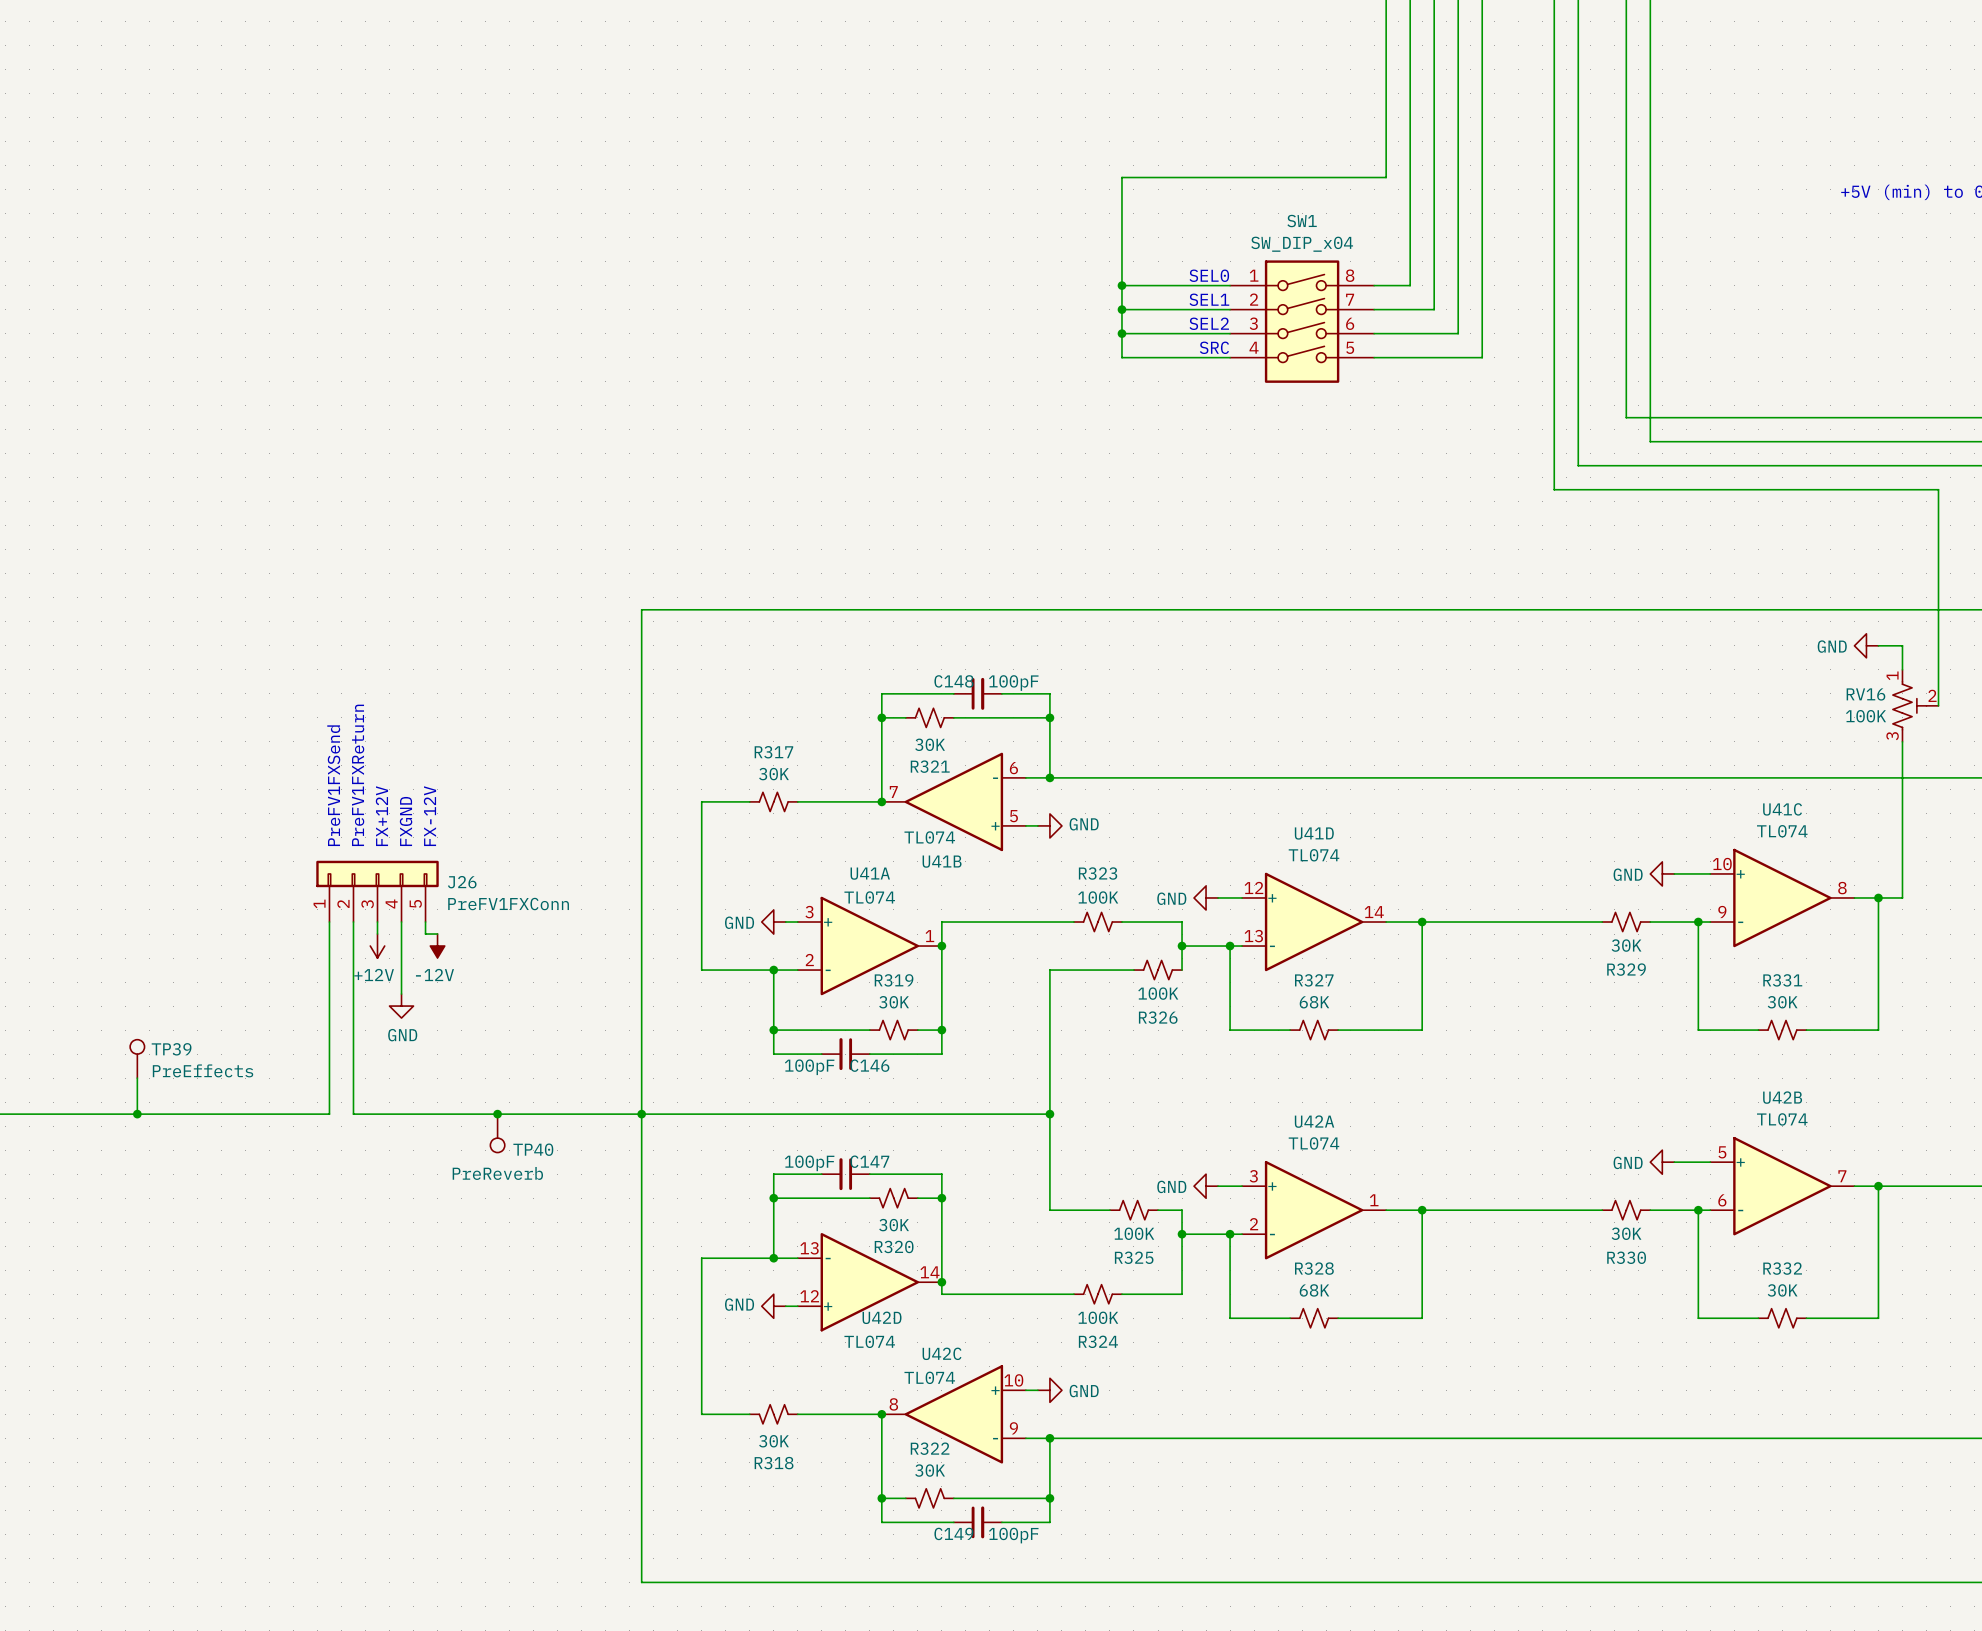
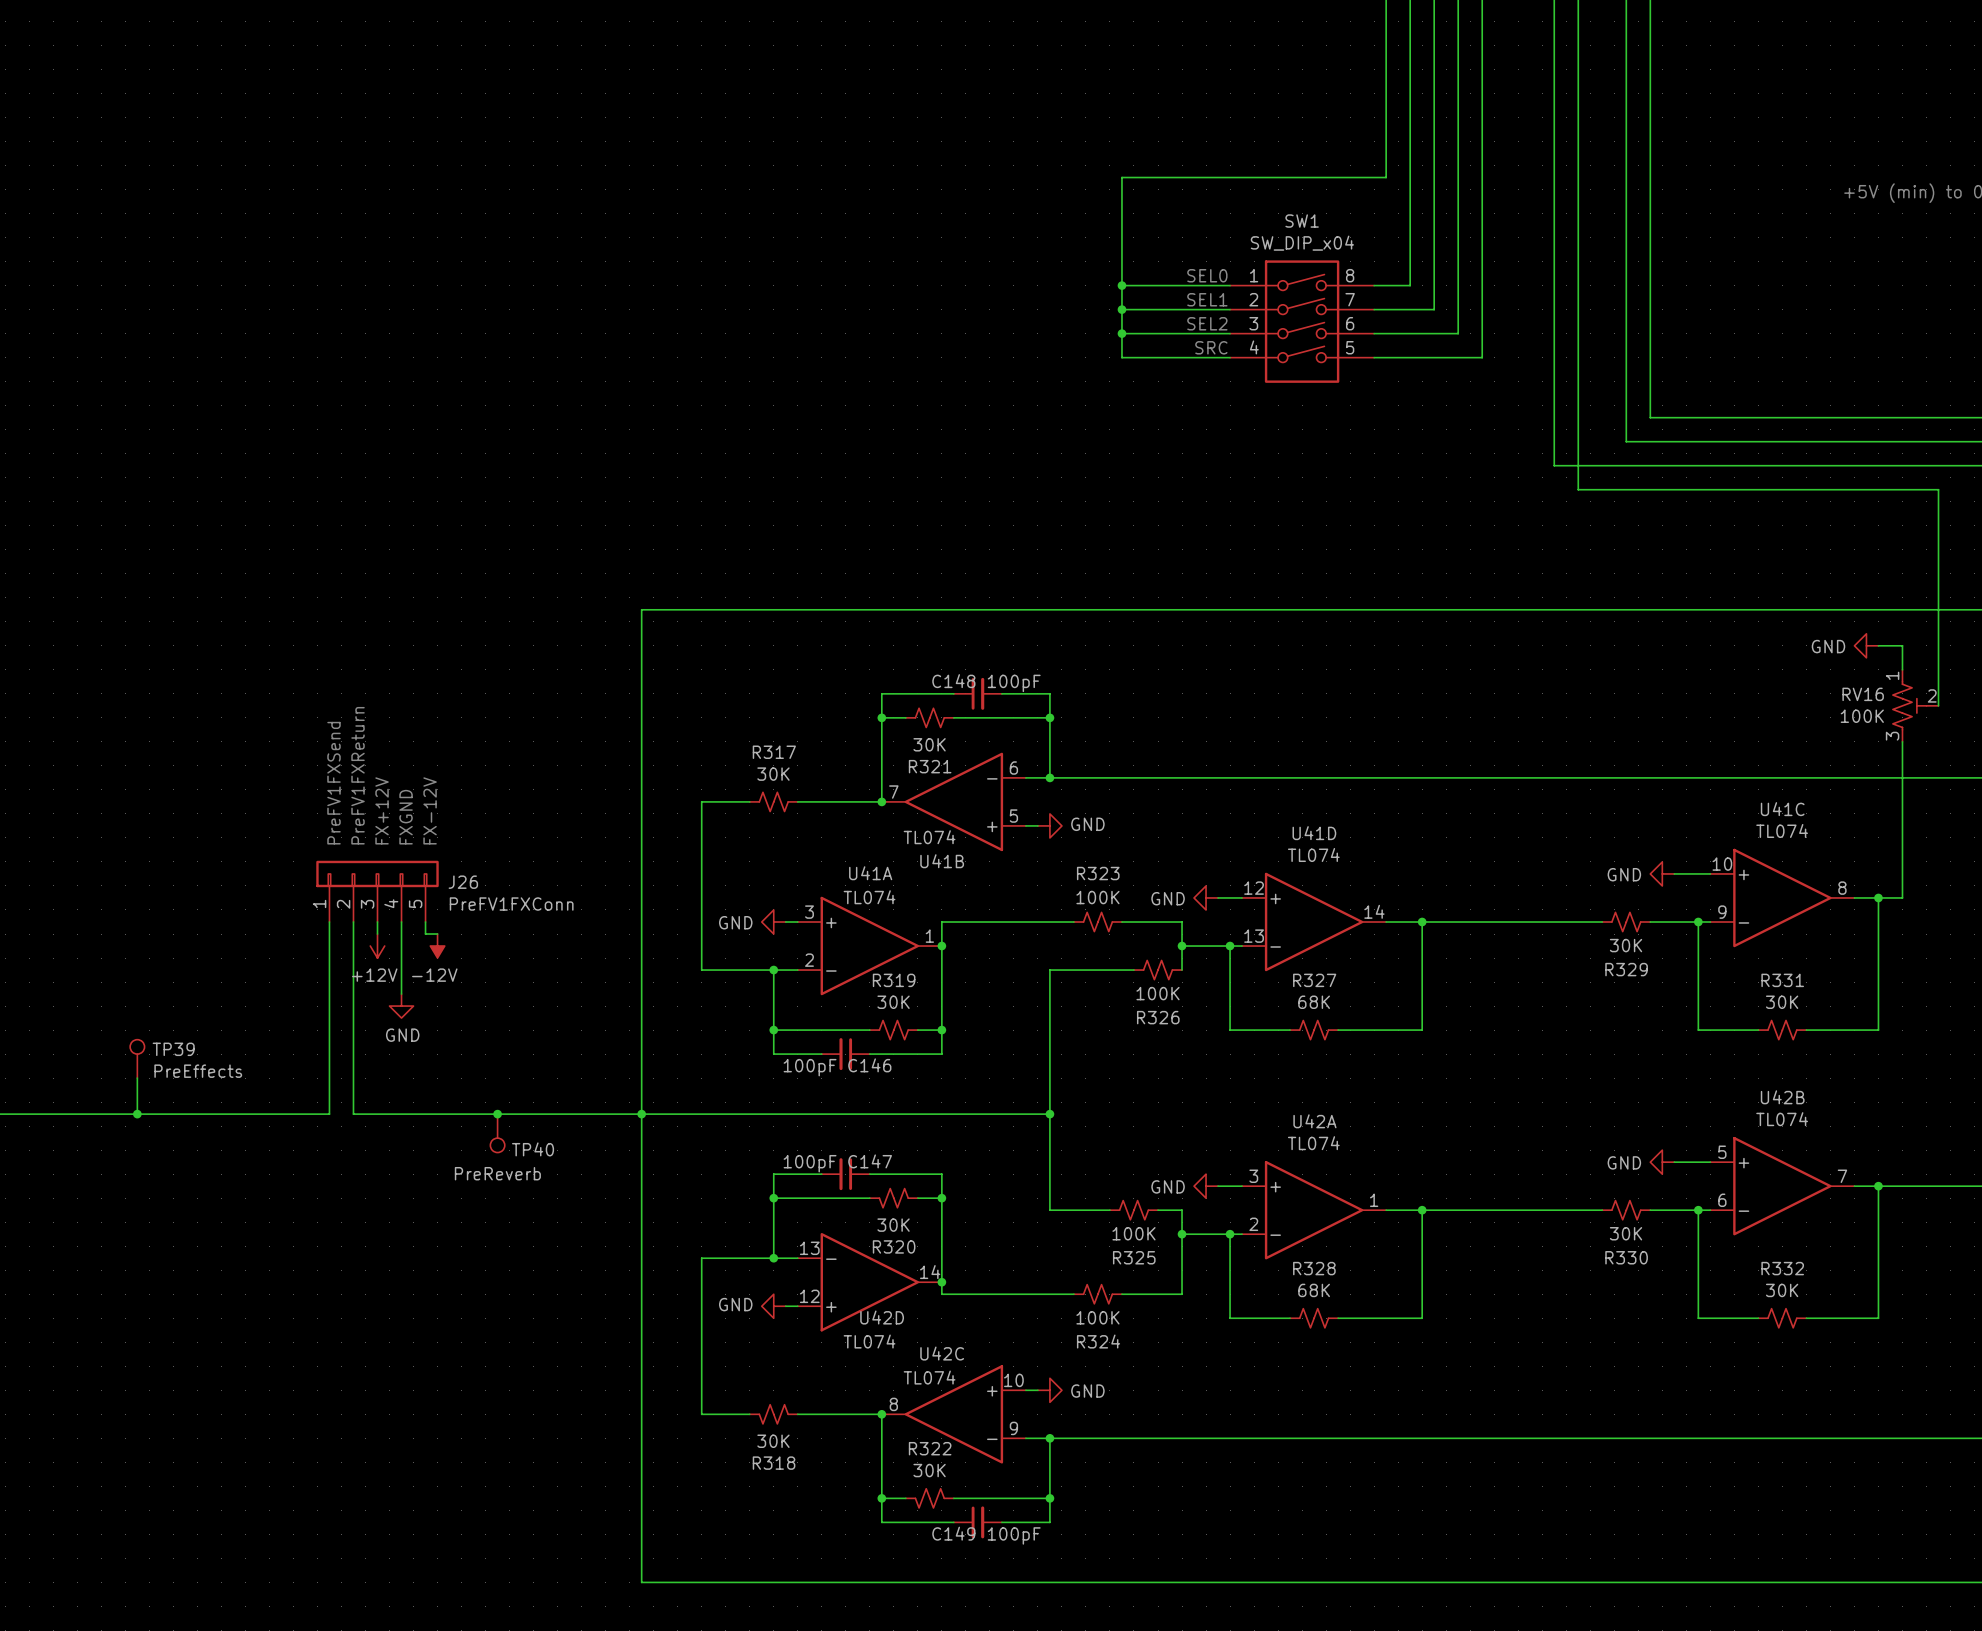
wire: (1626, 417) (1650, 417) (1650, 441) -> (1626, 417) (1626, 441) (1650, 441)
wire: (1554, 465) (1554, 489) (1578, 489) -> (1554, 465) (1578, 465) (1578, 489)

